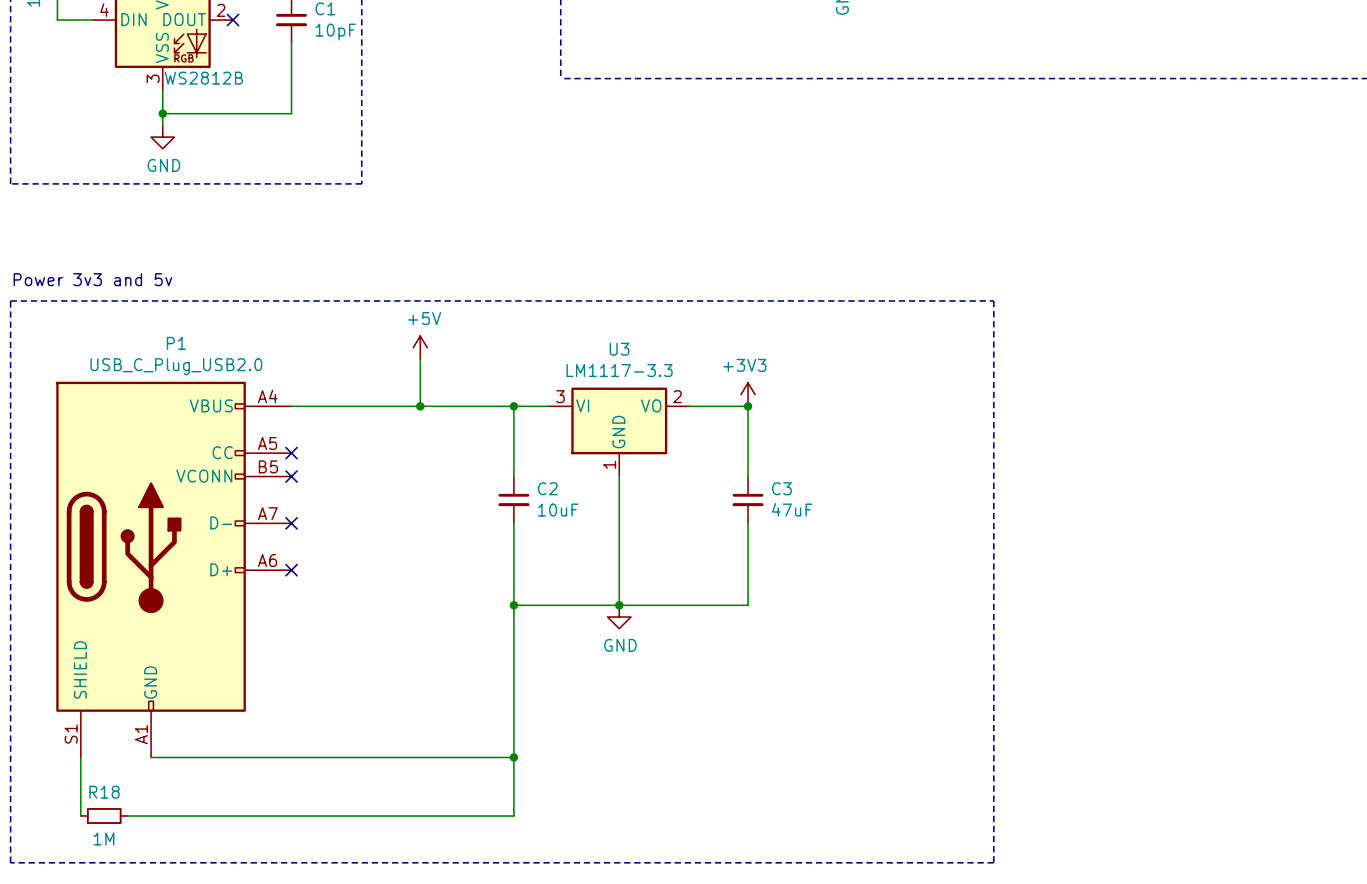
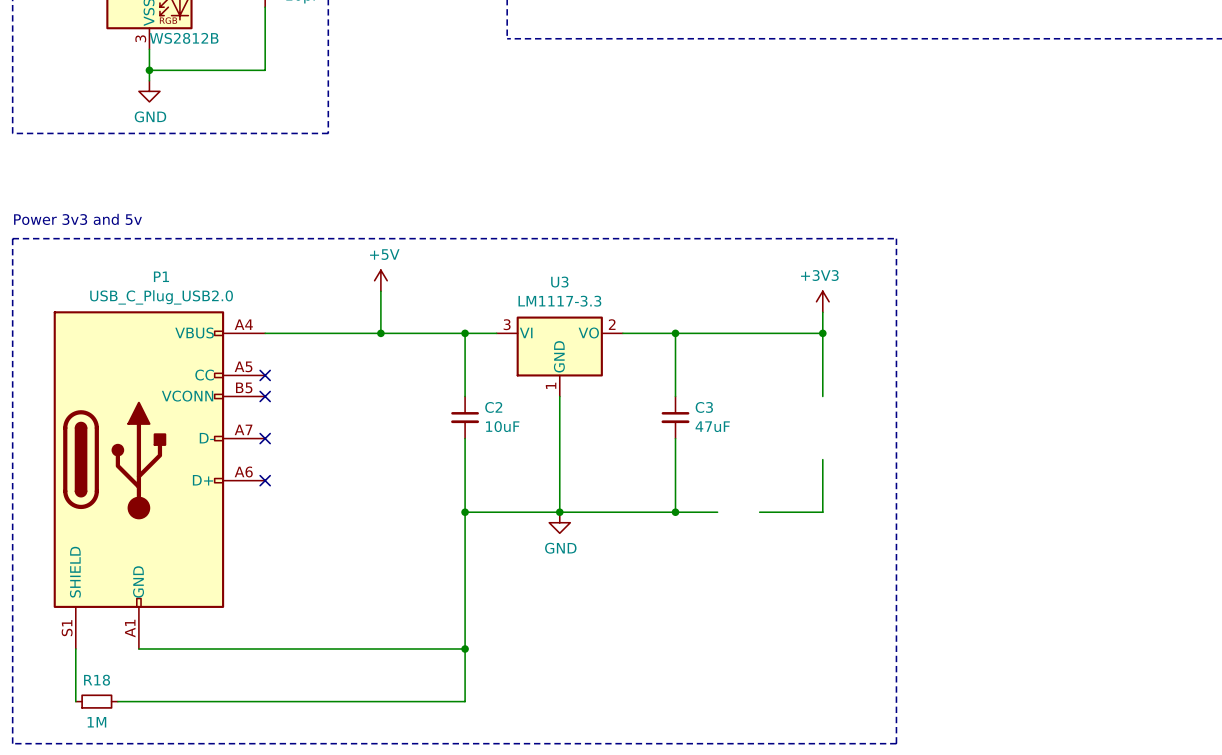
wire: none -> (822, 312) (822, 396)
power symbol position: +3V3 (748, 394) -> +3V3 (822, 301)
wire: none -> (675, 333) (822, 333)
junction: none -> (822, 333)
wire: none -> (822, 459) (822, 512) (759, 512)
wire: none -> (675, 512) (717, 512)
junction: none -> (675, 512)

